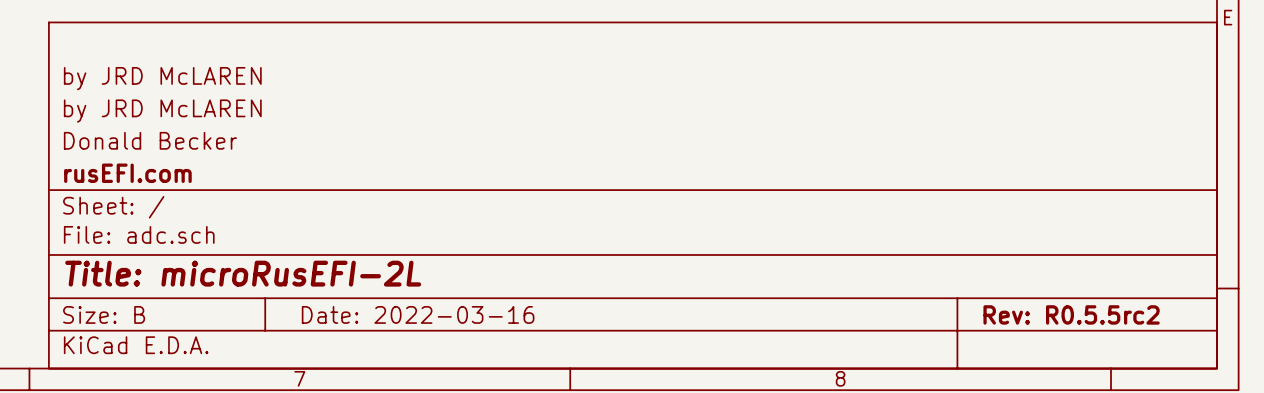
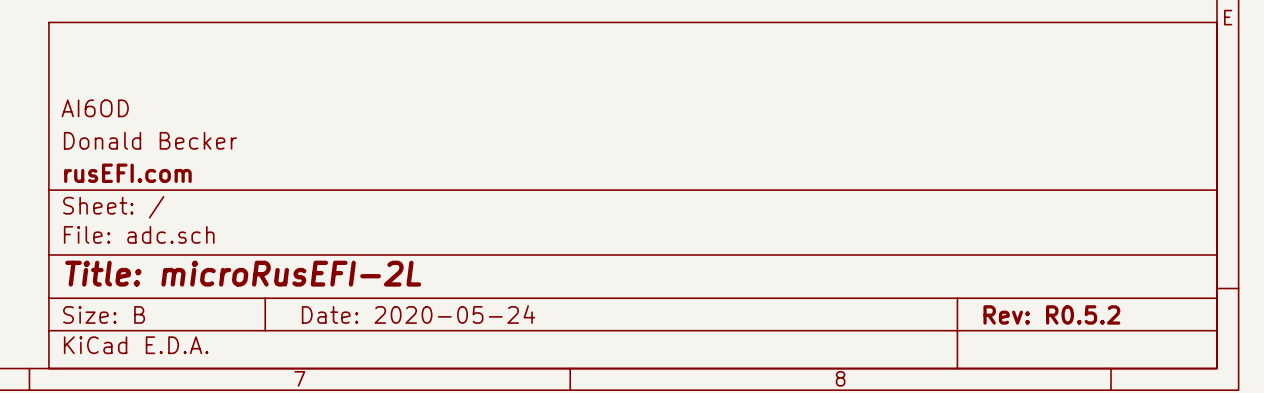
title block: by JRD McLAREN (162, 78) -> none
title block: by JRD McLAREN (162, 111) -> AI6OD (95, 108)
title block: Date: 2022-03-16 (418, 314) -> Date: 2020-05-24 (418, 314)
title block: Rev: R0.5.5rc2 (1071, 314) -> Rev: R0.5.2 (1051, 314)

